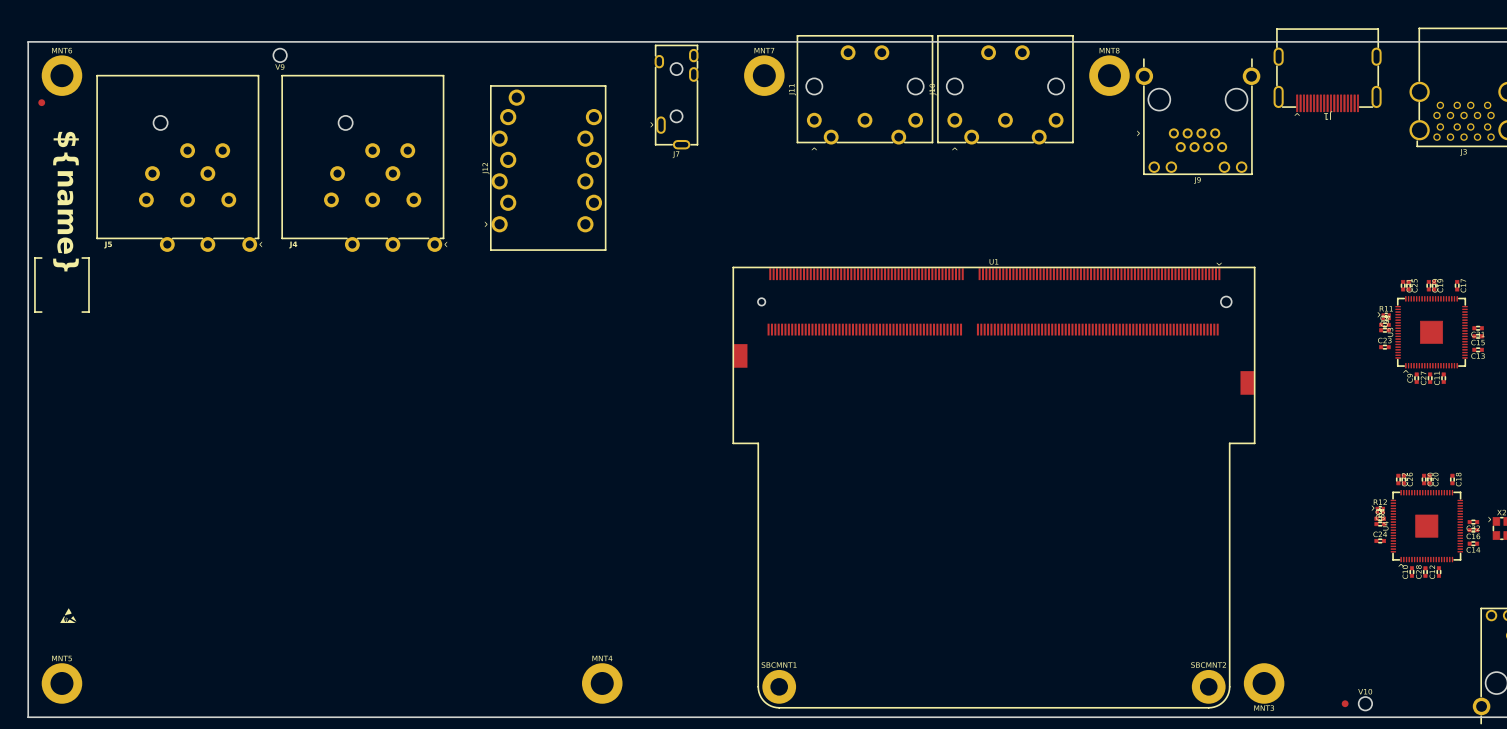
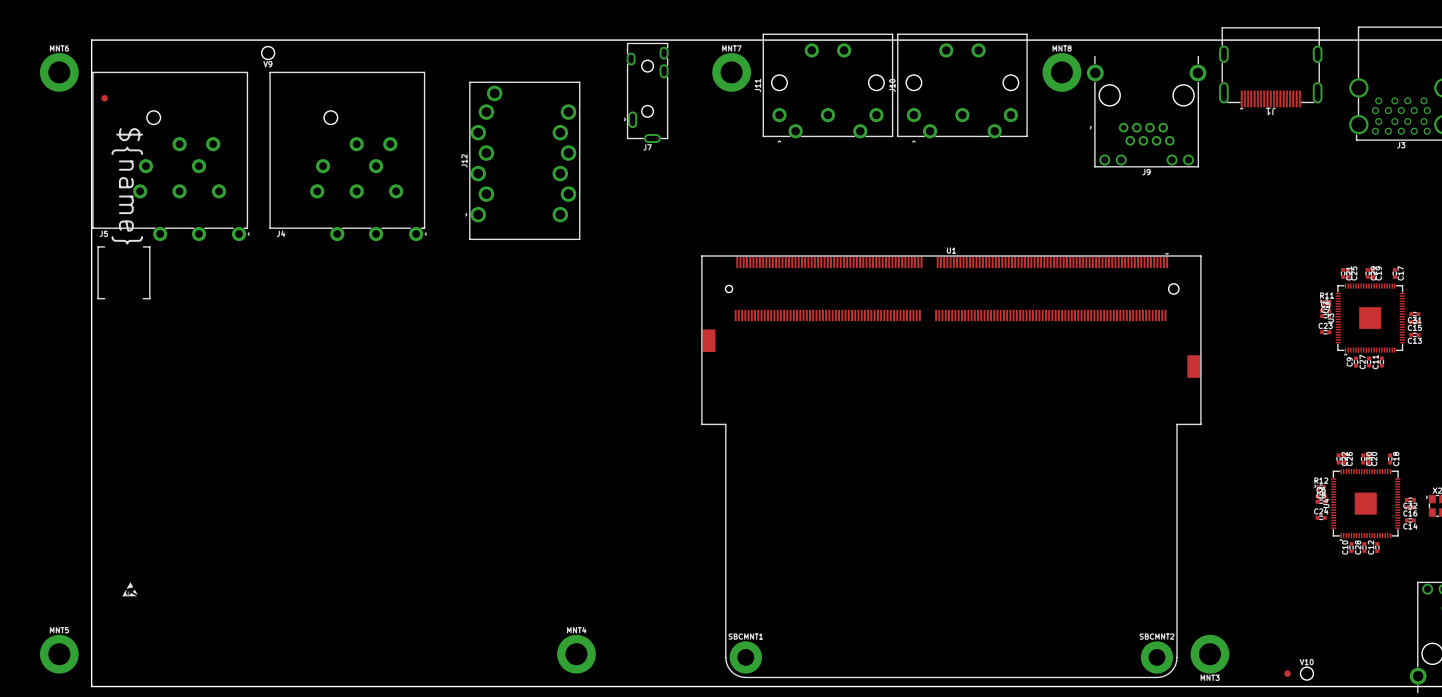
board edge: (95, 41) (28, 41) (28, 717) (95, 717) -> (91, 40) (91, 686)
drawing position: (41, 102) -> (104, 98)
text position: ${name} (65, 201) -> ${name} (127, 186)
drawing position: (61, 285) -> (123, 272)
drawing position: (68, 615) -> (130, 589)

